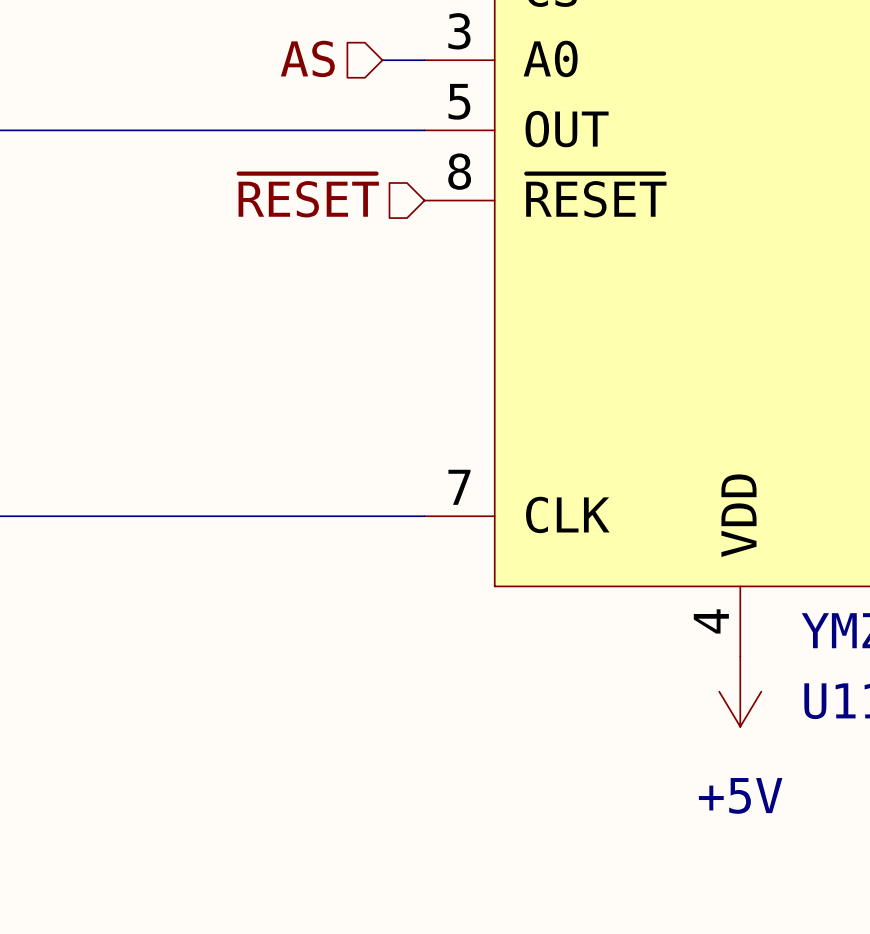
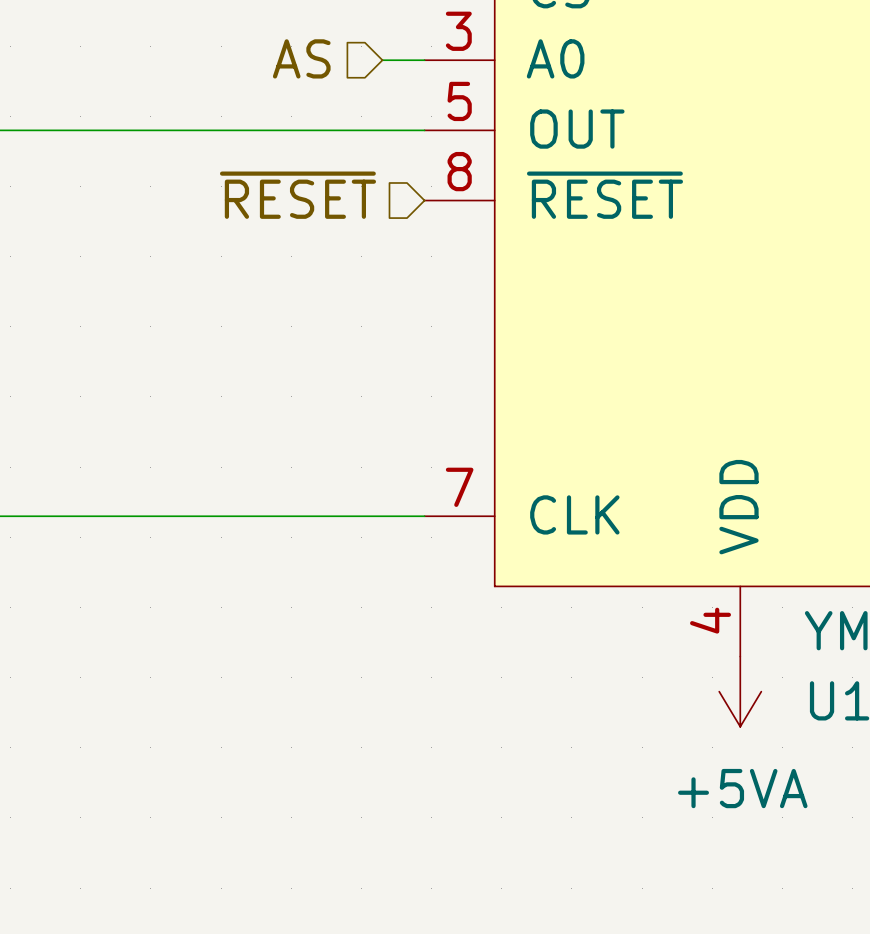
power symbol: +5V (740, 691) -> +5VA (740, 691)

